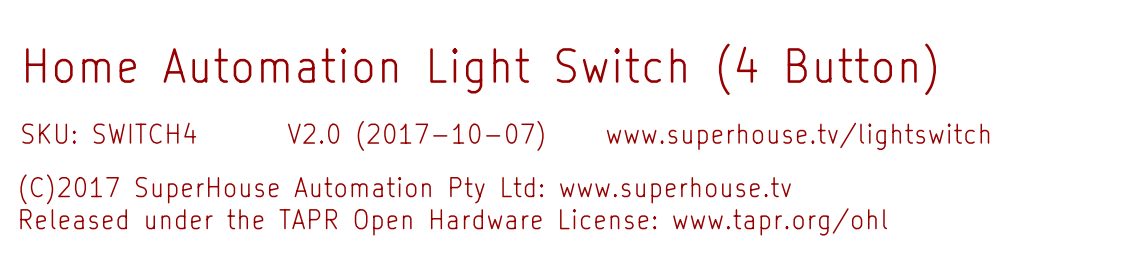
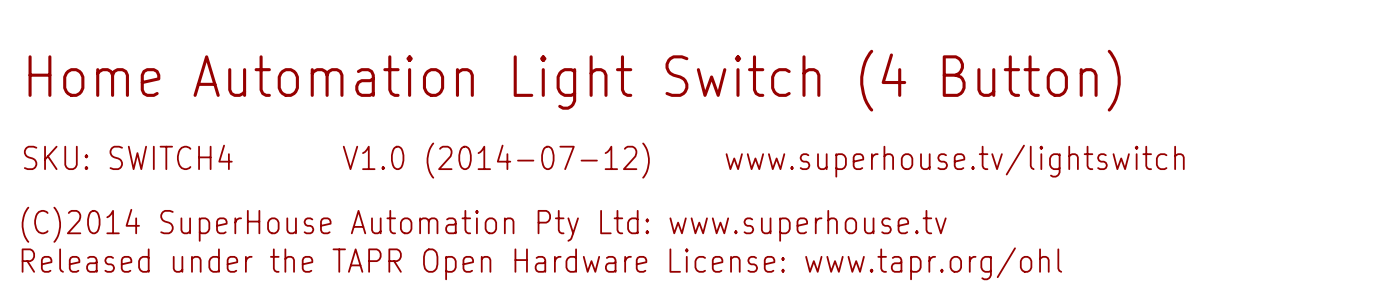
text: V2.0 (2017-10-07) (415, 135) -> V1.0 (2014-07-12) (496, 160)
text: (C)2017 SuperHouse Automation Pty Ltd: www.superhouse.tv (405, 189) -> (C)2014 SuperHouse Automation Pty Ltd: www.superhouse.tv (484, 224)

